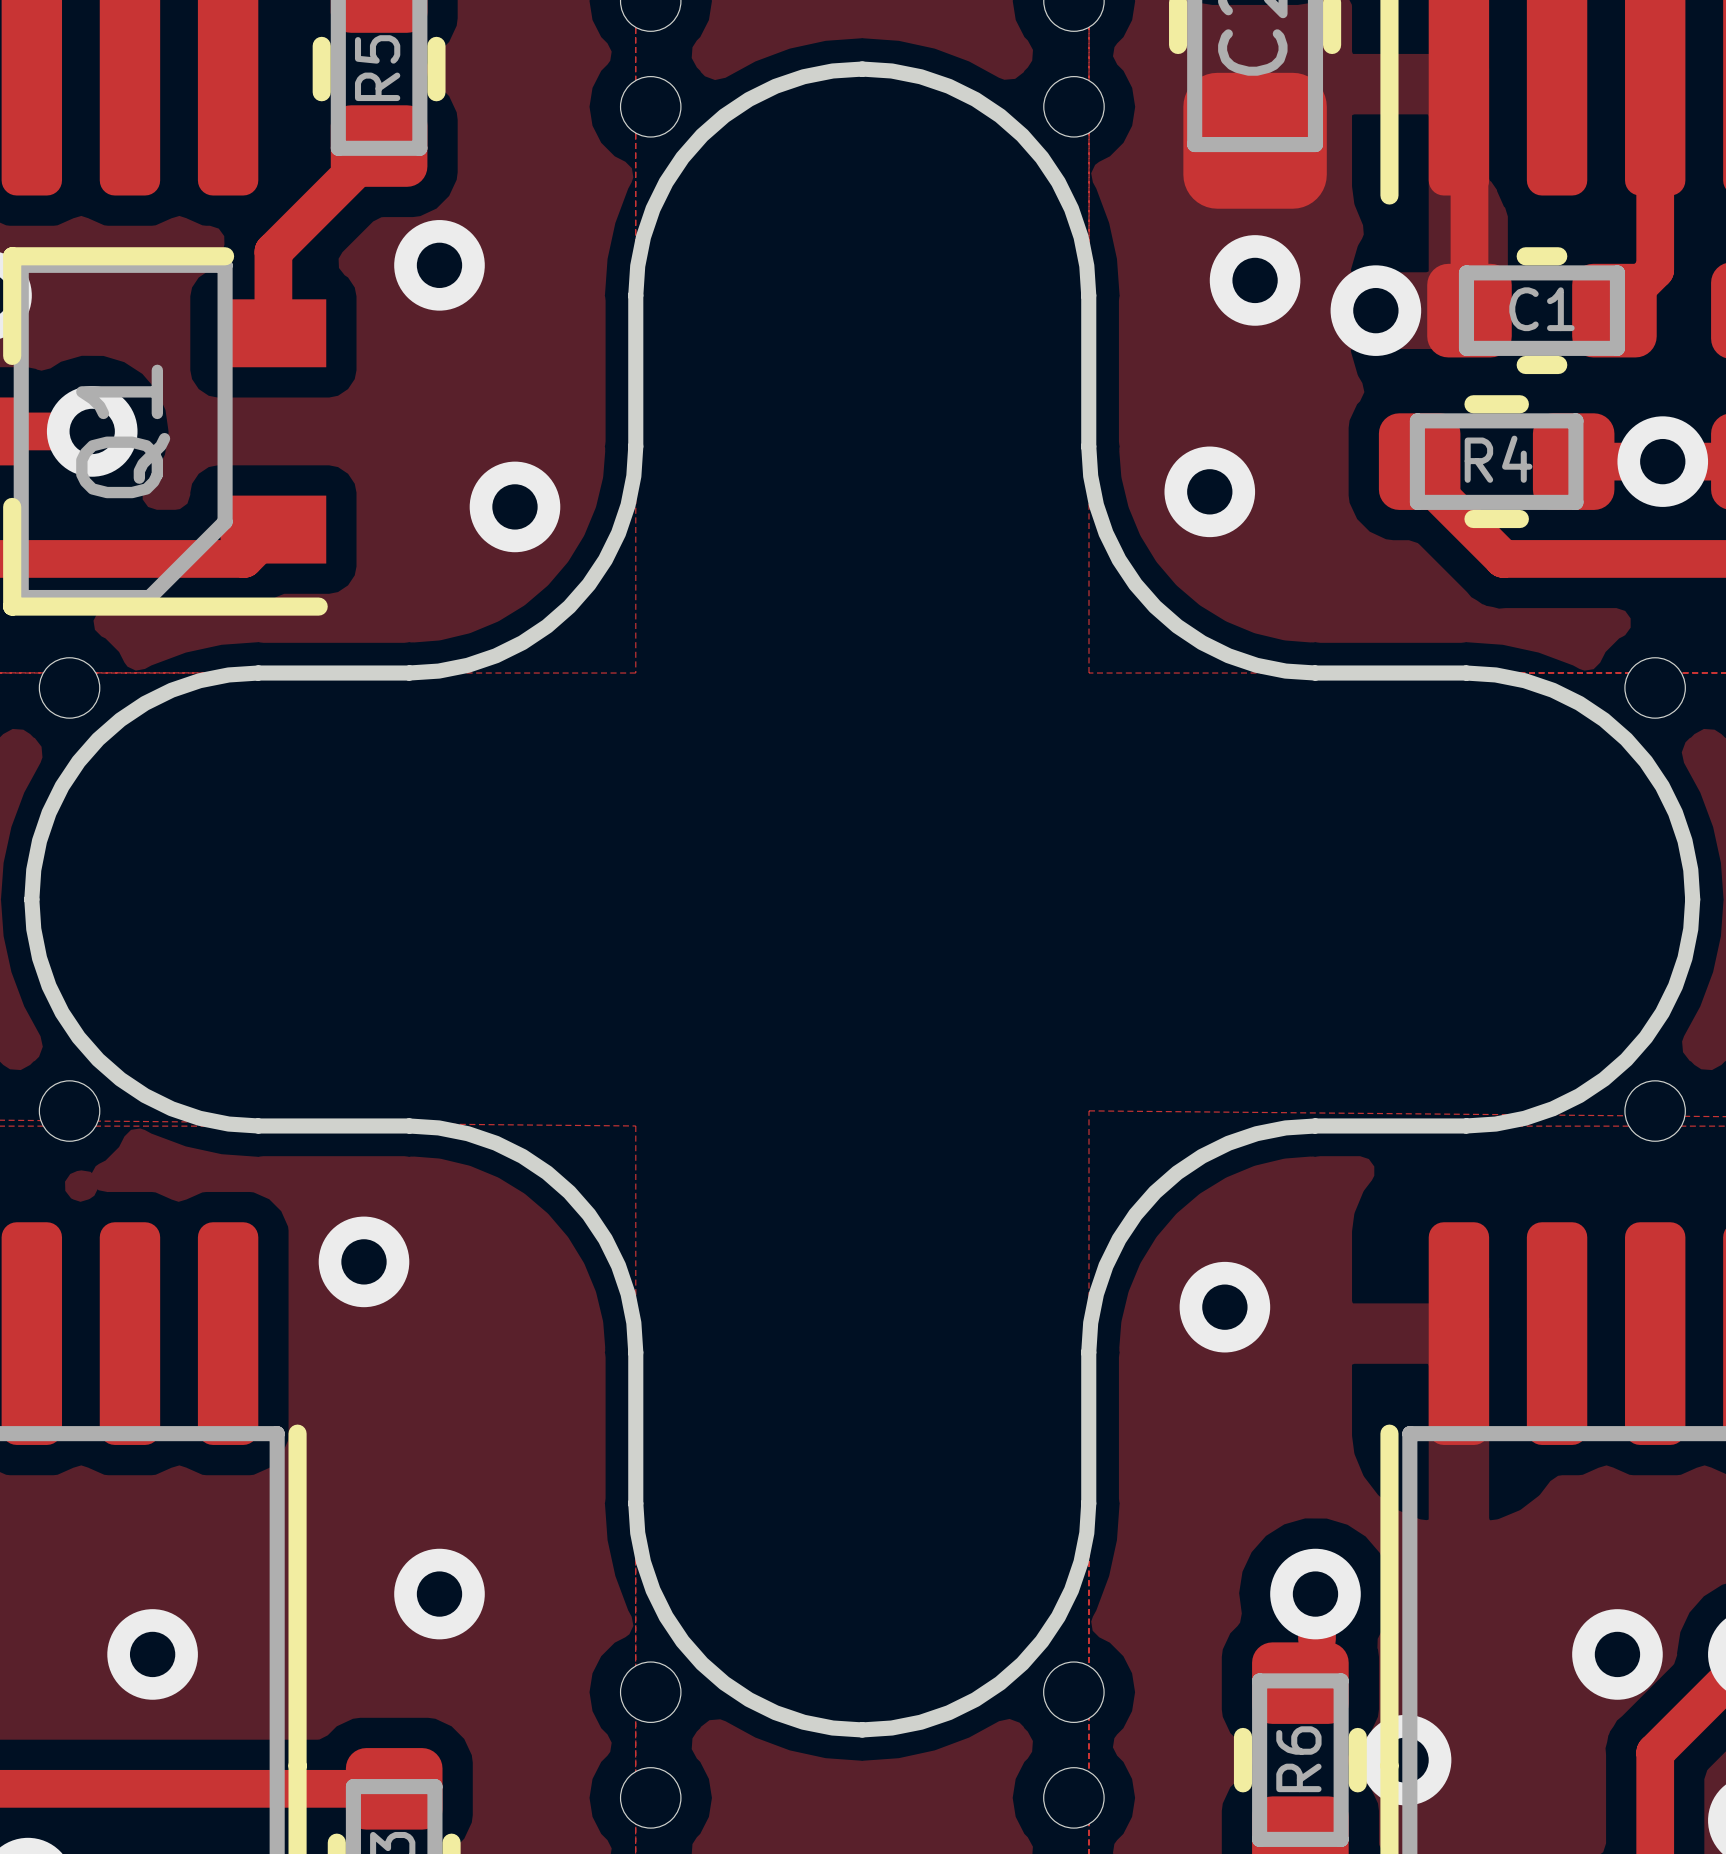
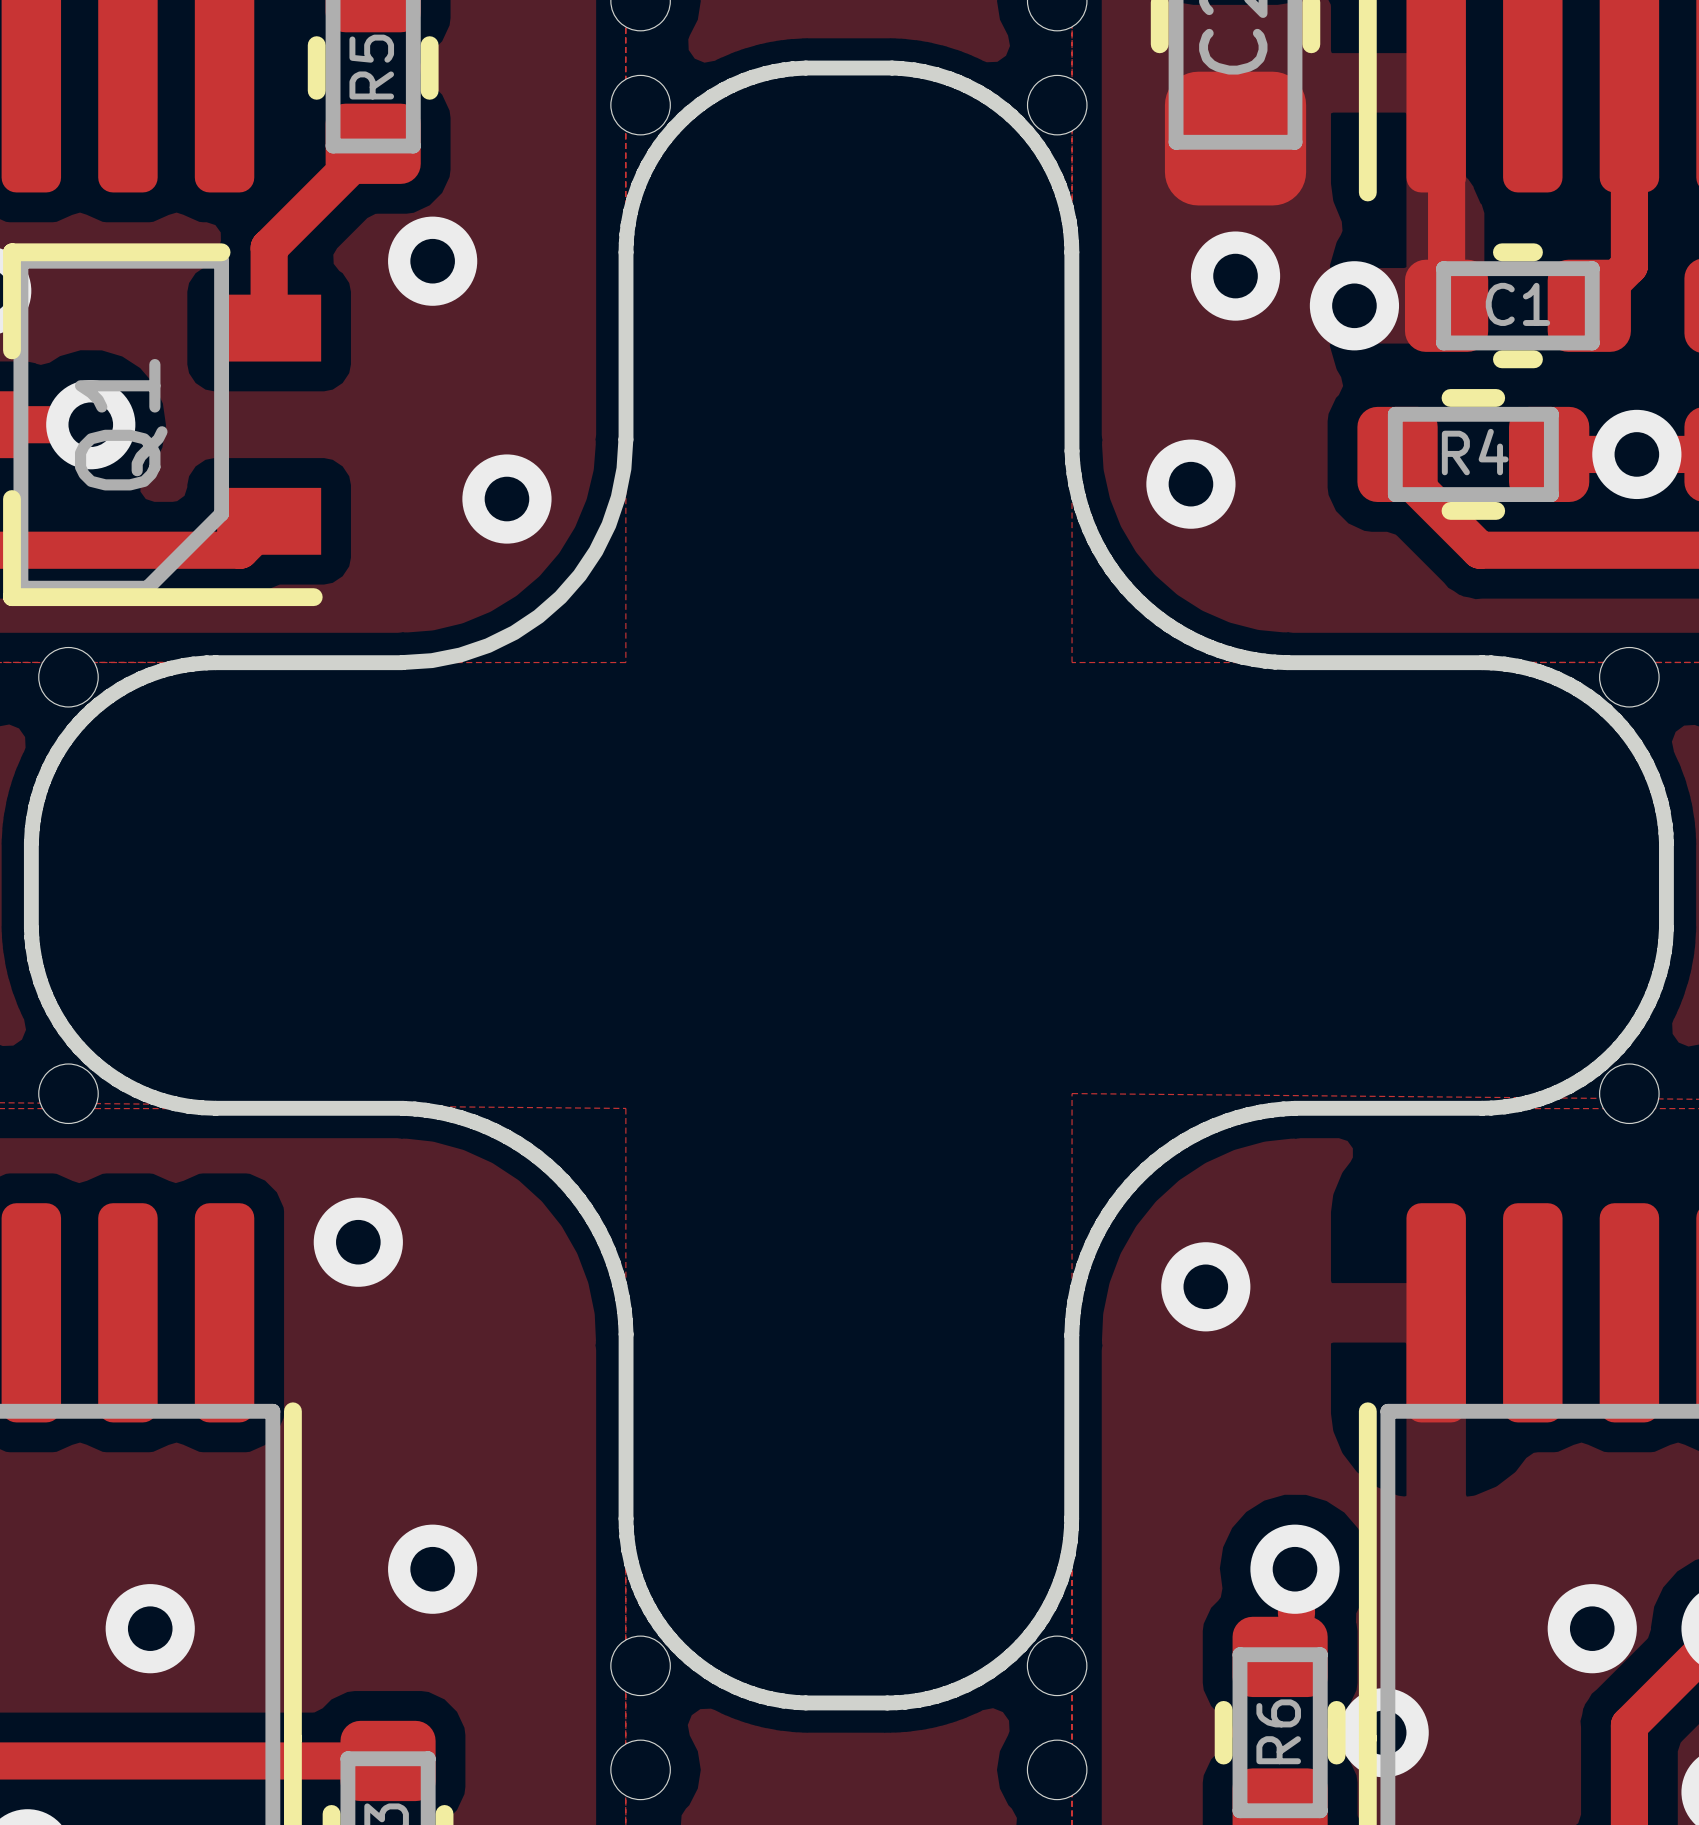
board edge: (635, 295) (637, 265) (643, 236) (653, 208) (666, 182) (682, 157) (702, 135) (724, 115) (749, 99) (775, 86) (803, 76) (832, 70) (862, 69) (891, 70) (920, 76) (948, 86) (975, 99) (1000, 115) (1022, 135) (1041, 157) (1058, 182) (1071, 208) (1081, 236) (1086, 265) (1088, 295) (1088, 446) (1090, 476) (1096, 505) (1105, 533) (1119, 559) (1135, 584) (1155, 606) (1177, 626) (1201, 642) (1228, 655) (1256, 665) (1285, 671) (1315, 673) -> (625, 290) (628, 225) (633, 198) (643, 173) (659, 146) (673, 128) (700, 104) (723, 89) (752, 77) (783, 69) (805, 68) (892, 68) (936, 74) (978, 91) (1011, 115) (1032, 138) (1056, 177) (1066, 207) (1071, 243) (1072, 462) (1081, 508) (1098, 548) (1111, 569) (1133, 595) (1150, 611) (1177, 630) (1198, 642) (1229, 653) (1264, 661) (1294, 662)
board edge: (258, 673) (228, 674) (199, 680) (171, 690) (145, 703) (120, 719) (98, 739) (78, 761) (62, 786) (49, 812) (39, 840) (33, 869) (31, 899) (33, 929) (39, 958) (49, 986) (62, 1012) (78, 1037) (98, 1059) (120, 1079) (145, 1095) (171, 1108) (199, 1118) (228, 1124) (258, 1125) (409, 1125) (438, 1127) (467, 1133) (495, 1143) (522, 1156) (547, 1172) (569, 1192) (588, 1214) (605, 1239) (618, 1265) (628, 1293) (633, 1322) (635, 1352) (635, 1503) (637, 1533) (643, 1562) (653, 1590) (666, 1616) (682, 1641) (702, 1663) (724, 1683) (749, 1699) (775, 1712) (803, 1722) (832, 1728) (862, 1729) (891, 1728) (920, 1722) (948, 1712) (975, 1699) (1000, 1683) (1022, 1663) (1041, 1641) (1058, 1616) (1071, 1590) (1081, 1562) (1086, 1533) (1088, 1503) (1088, 1352) (1090, 1322) (1096, 1293) (1105, 1265) (1119, 1239) (1135, 1214) (1155, 1192) (1177, 1172) (1201, 1156) (1228, 1143) (1256, 1133) (1285, 1127) (1315, 1125) (1466, 1125) (1495, 1124) (1524, 1118) (1552, 1108) (1579, 1095) (1604, 1079) (1626, 1059) (1645, 1037) (1662, 1012) (1675, 986) (1684, 958) (1690, 929) (1692, 899) (1690, 869) (1684, 840) (1675, 812) (1662, 786) (1645, 761) (1626, 739) (1604, 719) (1579, 703) (1552, 690) (1524, 680) (1495, 674) (1466, 673) -> (254, 662) (193, 664) (170, 668) (140, 678) (120, 688) (91, 710) (73, 730) (53, 760) (40, 789) (33, 819) (31, 842) (31, 928) (34, 959) (40, 981) (59, 1022) (79, 1047) (105, 1072) (136, 1090) (162, 1100) (202, 1107) (402, 1108) (425, 1110) (450, 1114) (485, 1126) (506, 1136) (536, 1156) (563, 1181) (592, 1219) (608, 1250) (619, 1285) (626, 1334) (626, 1536) (635, 1576) (654, 1617) (670, 1639) (696, 1663) (723, 1681) (744, 1690) (769, 1698) (796, 1702) (887, 1702) (905, 1702) (936, 1696) (966, 1685) (989, 1671) (1011, 1655) (1029, 1635) (1043, 1617) (1055, 1593) (1065, 1567) (1071, 1527) (1071, 1335) (1077, 1288) (1087, 1255) (1102, 1223) (1123, 1193) (1146, 1168) (1175, 1146) (1204, 1129) (1227, 1120) (1260, 1112) (1294, 1108) (1491, 1108) (1518, 1104) (1540, 1098) (1569, 1086) (1595, 1069) (1624, 1040) (1642, 1014) (1659, 973) (1666, 928) (1665, 824) (1657, 789) (1642, 756) (1627, 733) (1605, 710) (1588, 696) (1556, 678) (1531, 669) (1504, 664) (1443, 662)

